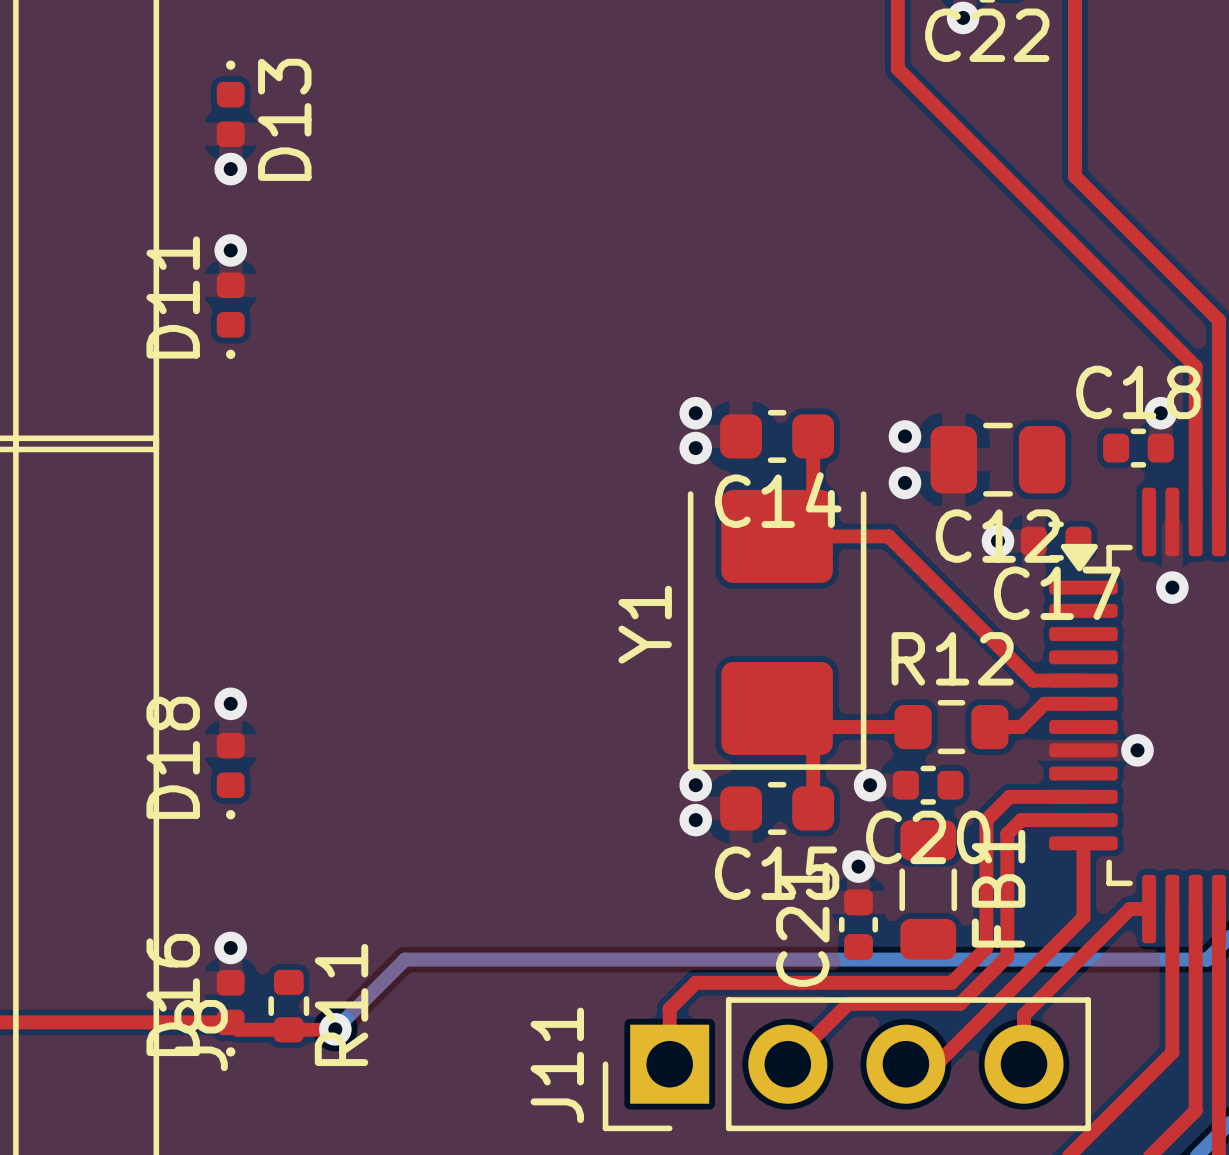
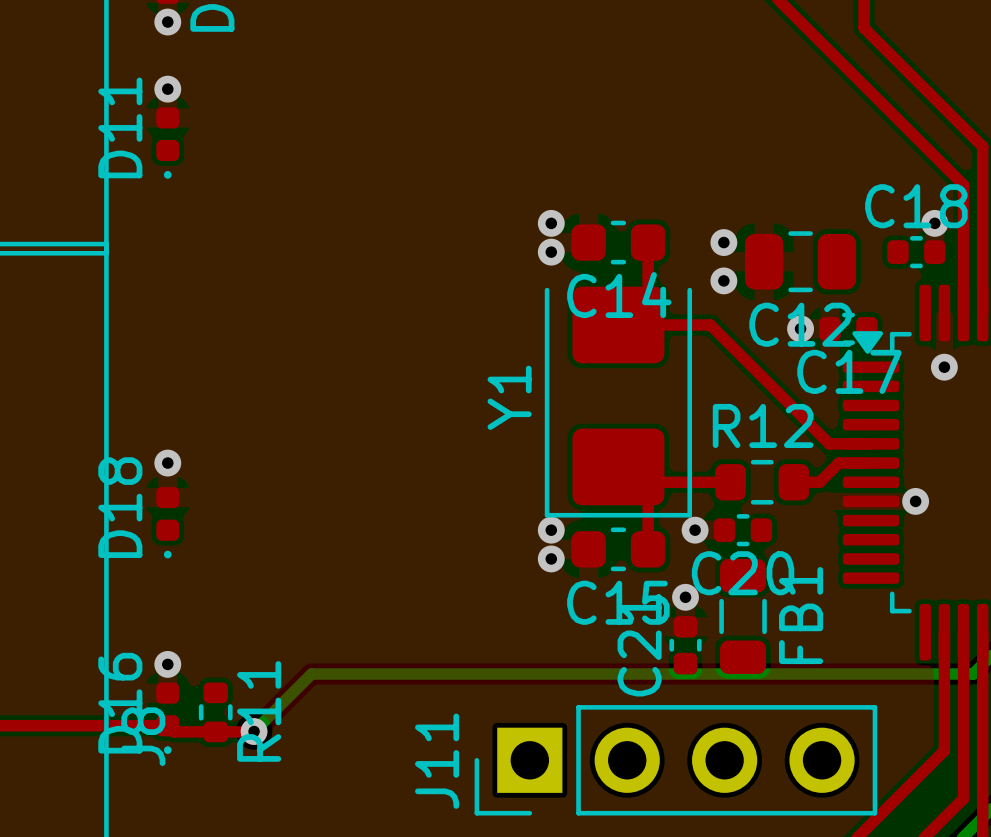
top track: (1083, 796) (1009, 796) (986, 820) (986, 947) (951, 982) (695, 982) (669, 1008) (669, 1064) -> none
top track: (1083, 820) (1021, 820) (1007, 834) (1007, 956) (960, 1003) (848, 1003) (787, 1064) -> none
top track: (1083, 843) (1083, 917) (936, 1064) (905, 1064) -> none
top track: (1149, 909) (1129, 909) (1024, 1014) (1024, 1064) -> none

